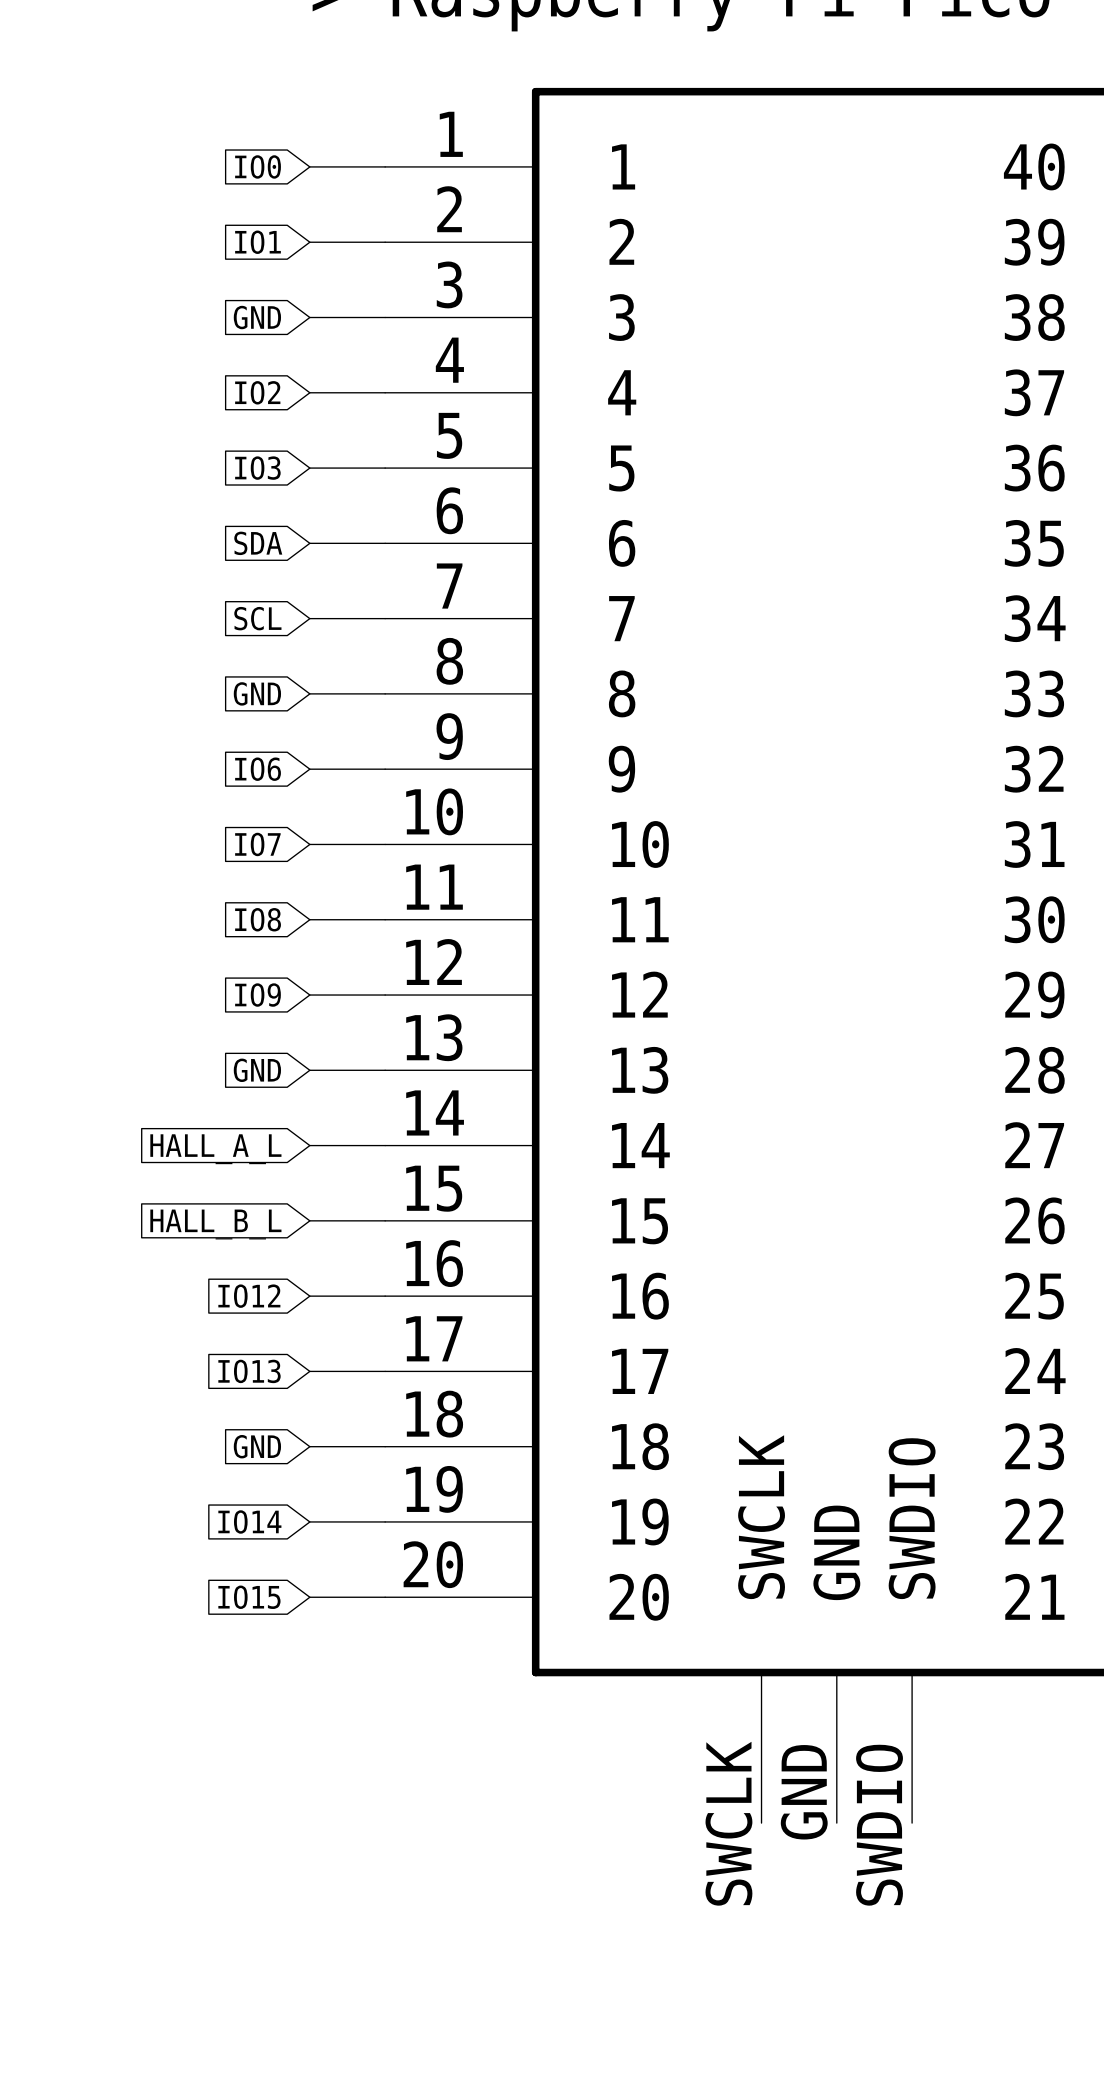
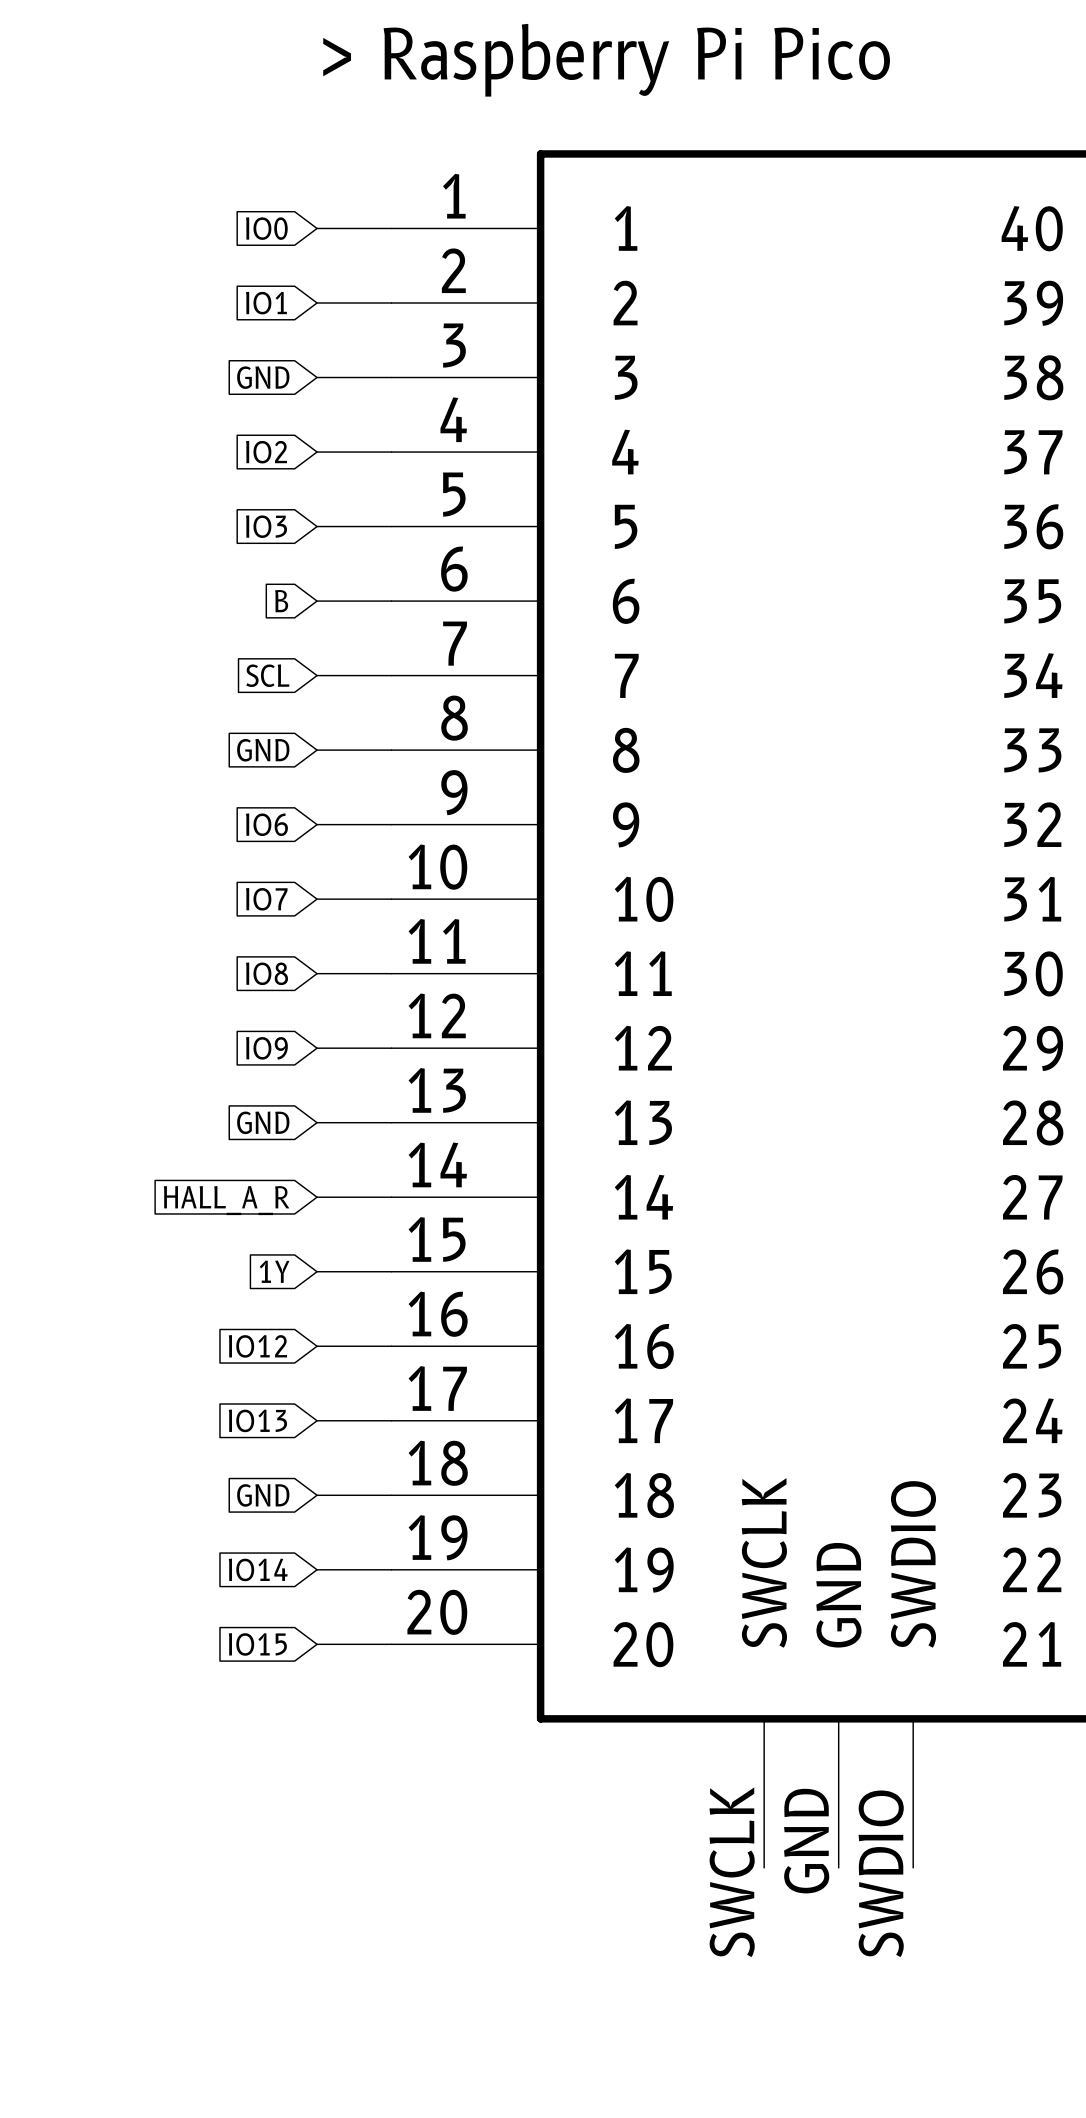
global label: SDA (258, 543) -> B (281, 601)
global label: HALL_A_L (215, 1149) -> HALL_A_R (226, 1200)
global label: HALL_B_L (215, 1224) -> 1Y (274, 1271)

